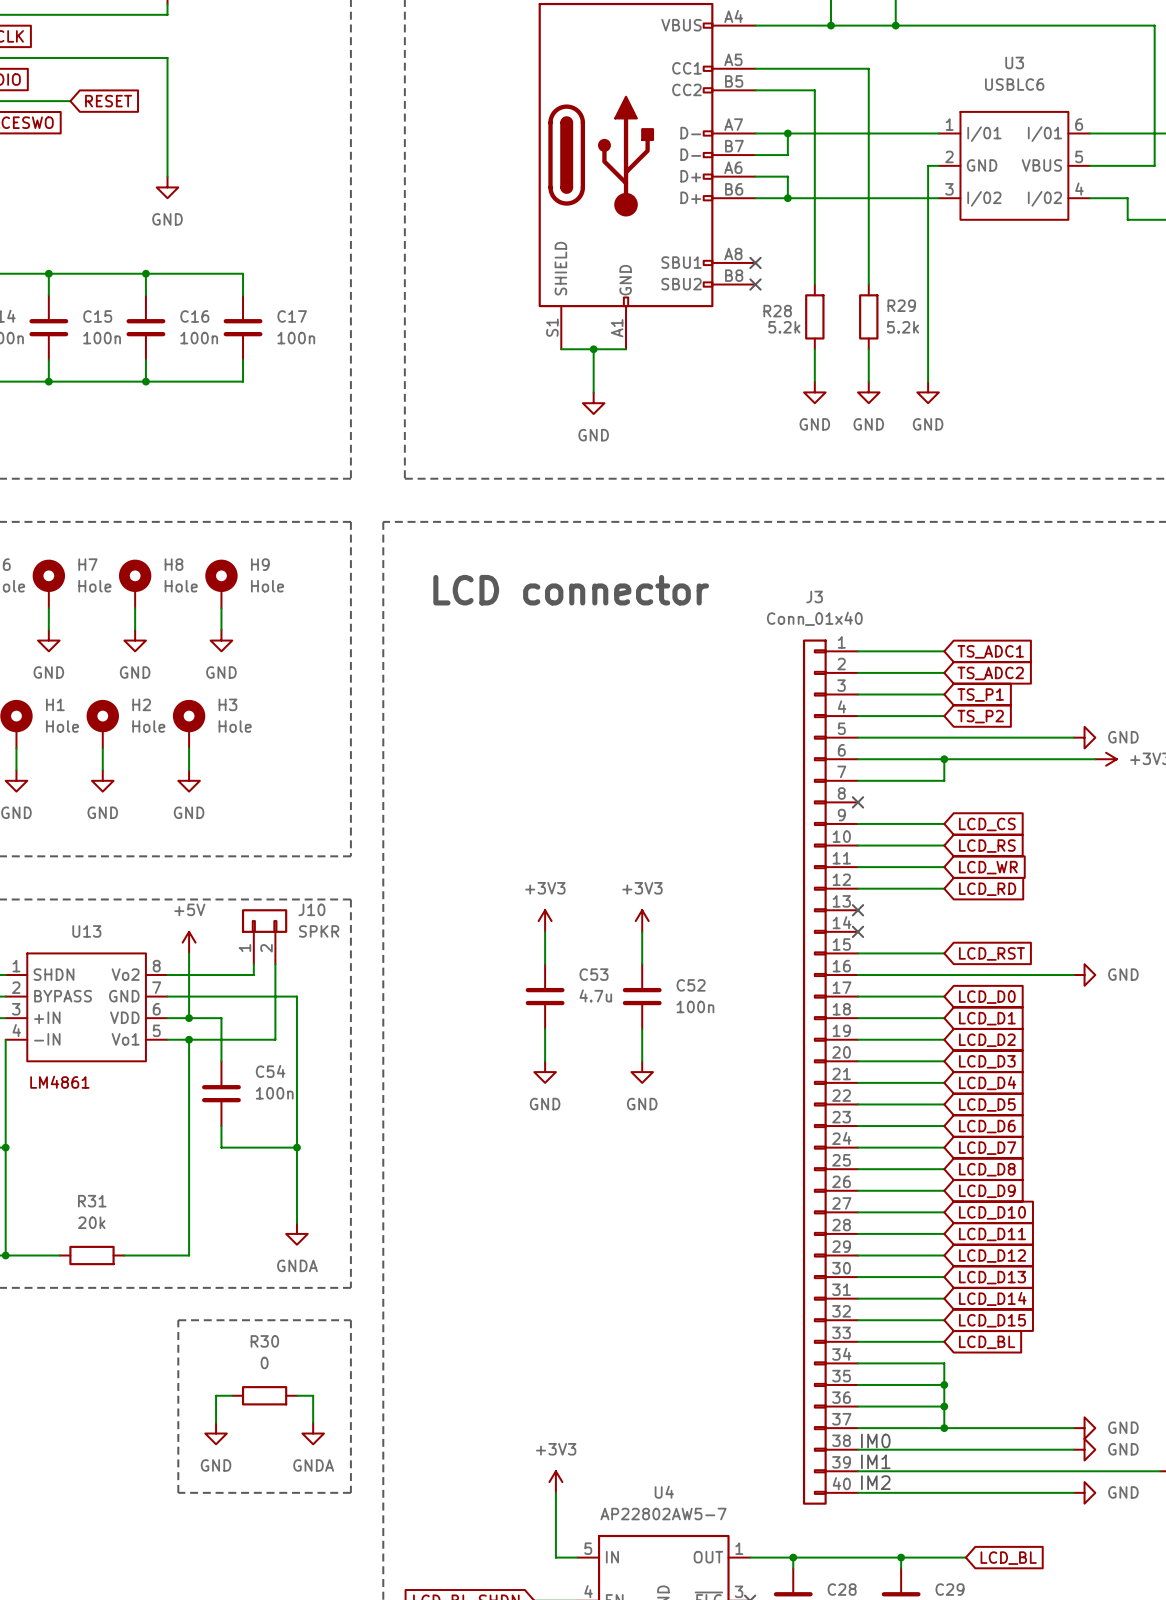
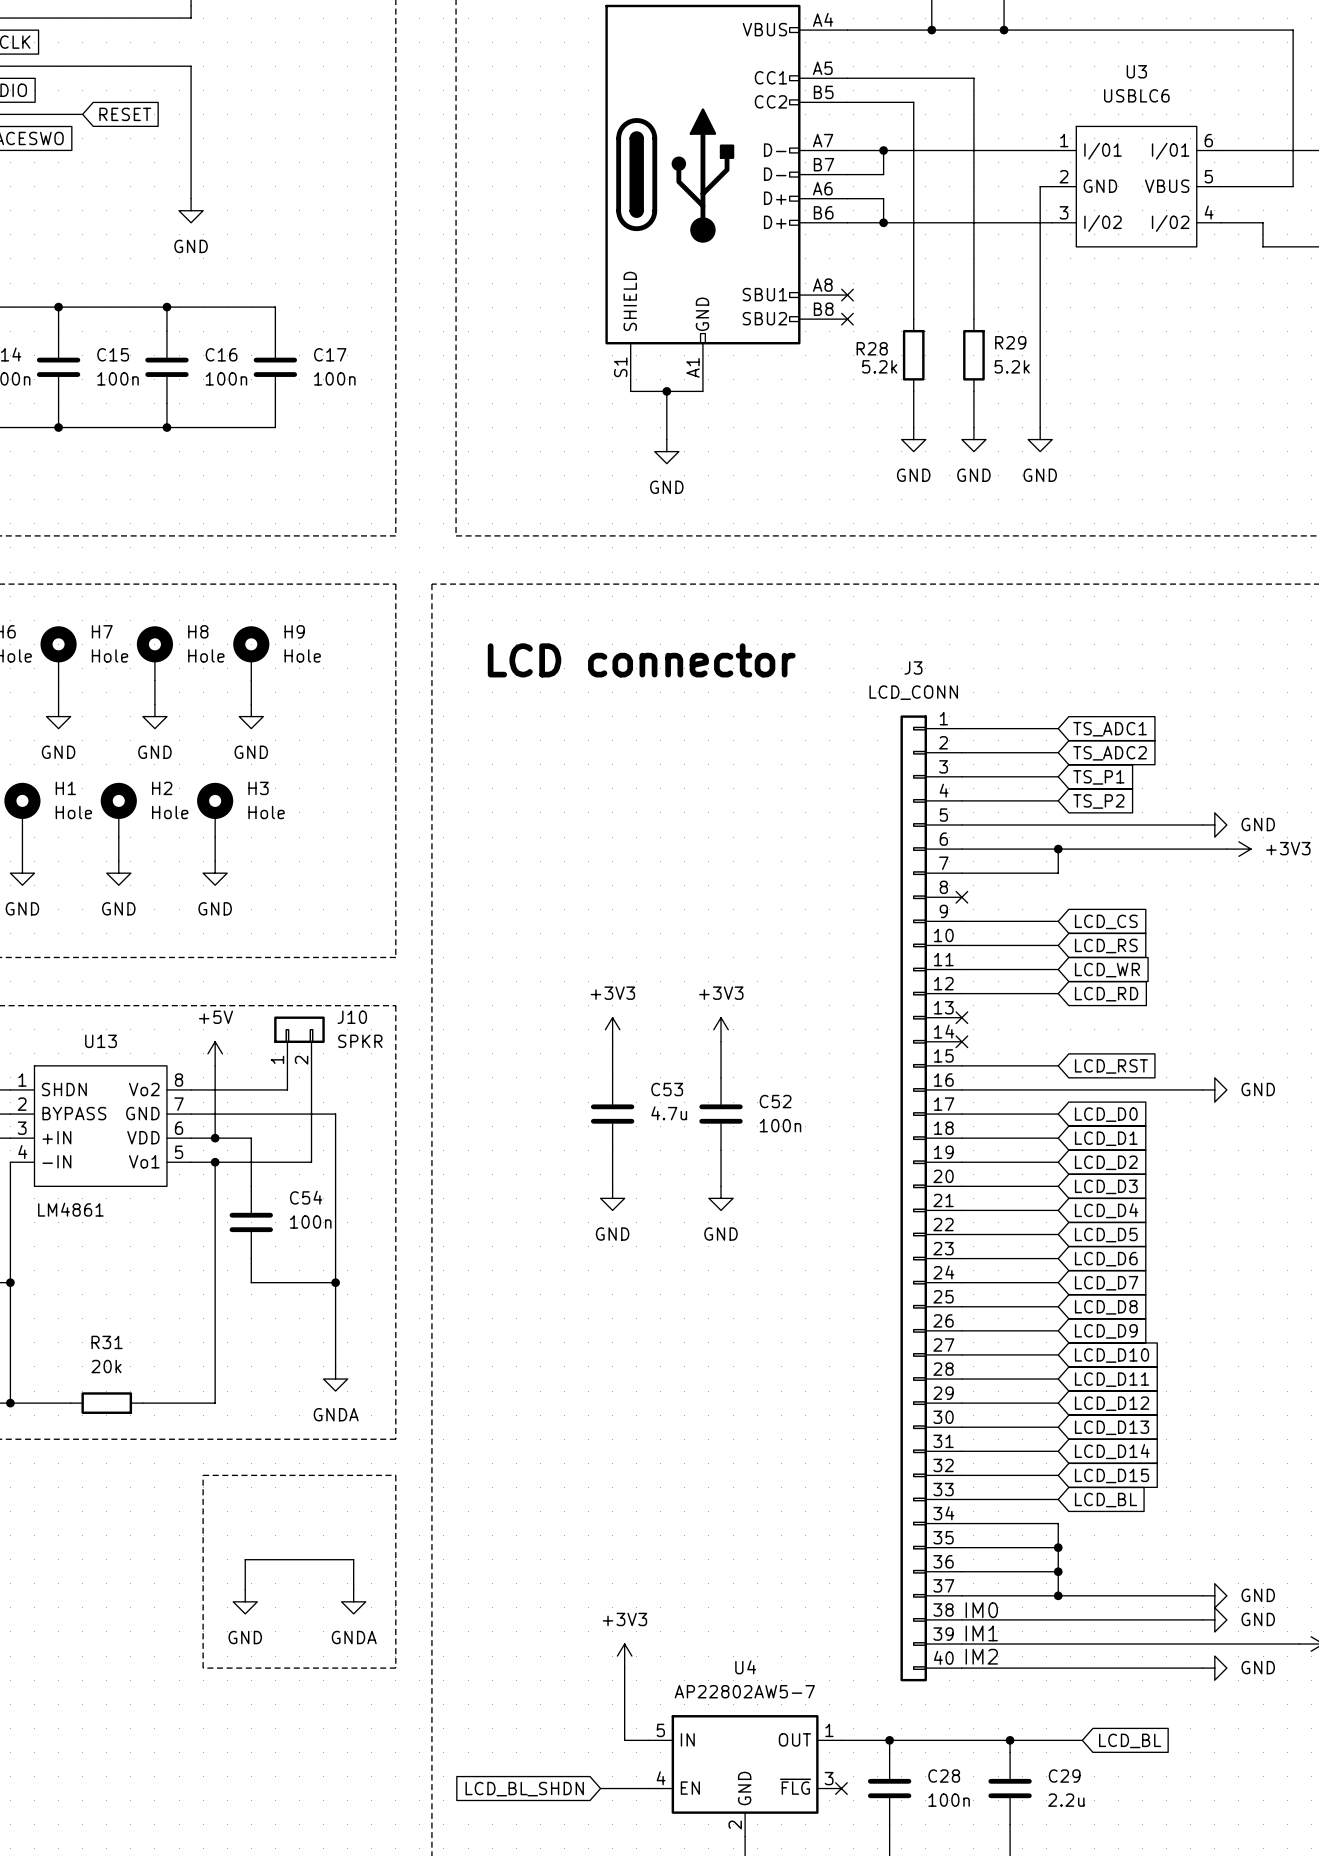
J3 value: Conn_01x40 (814, 618) -> LCD_CONN (913, 692)
wire: none -> (263, 1559) (335, 1559)
R30: 0 (264, 1395) -> none

